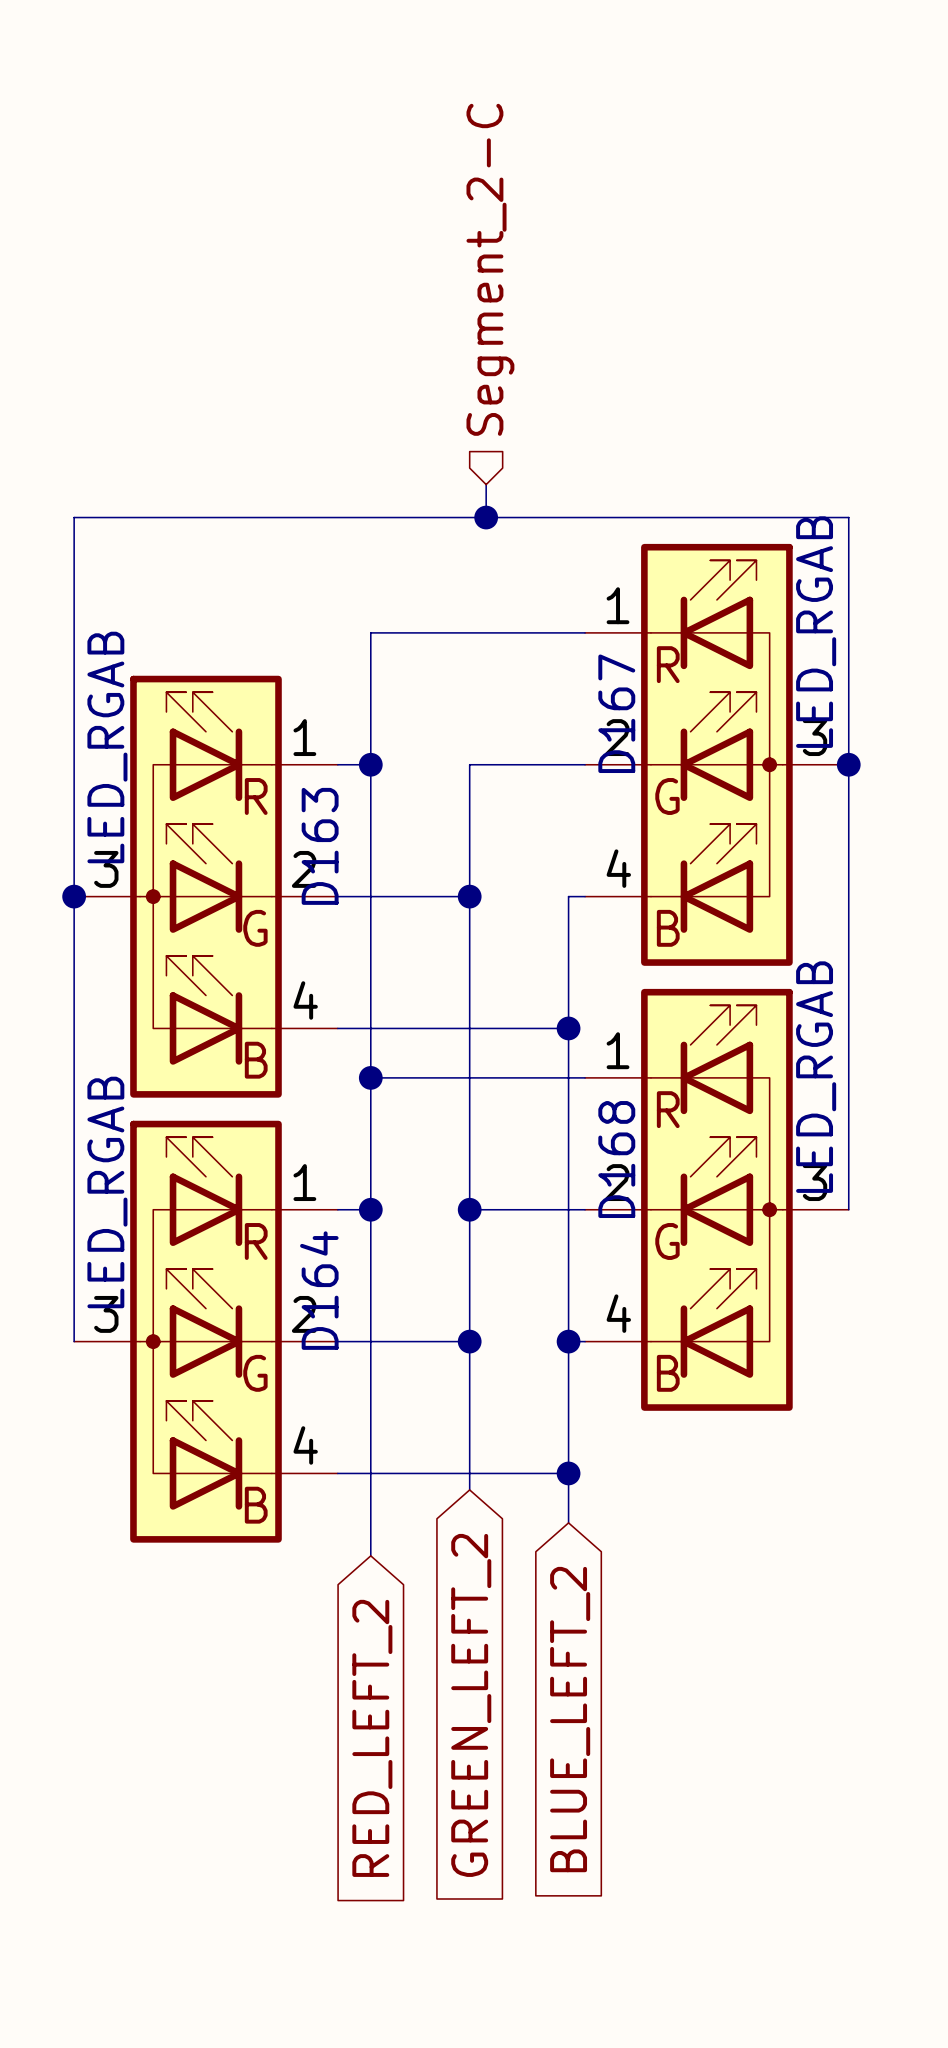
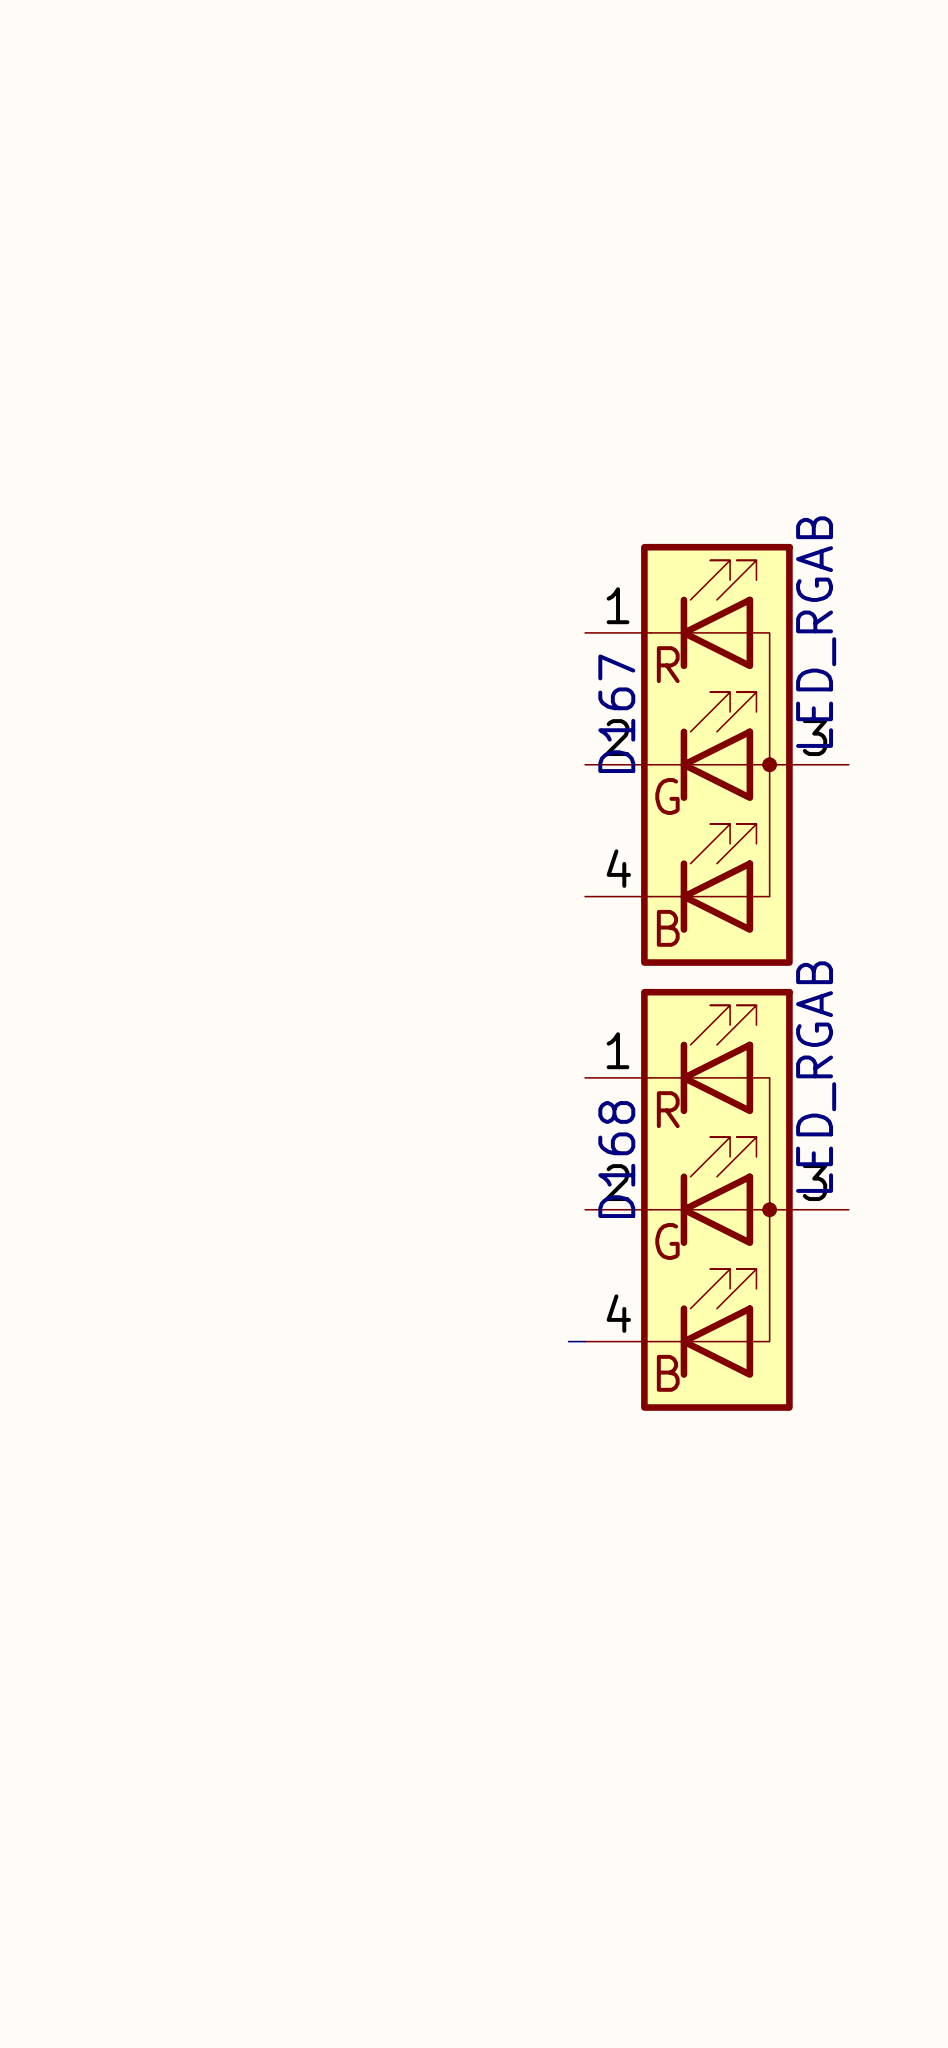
hierarchical label: Segment_2-C (490, 269) -> none
wire: (486, 484) (486, 517) -> none
junction: (486, 517) -> none
wire: (585, 632) (370, 632) (370, 1555) -> none
wire: (337, 764) (370, 764) -> none
junction: (370, 764) -> none
wire: (585, 764) (469, 764) (469, 1489) -> none
junction: (848, 764) -> none
D163: LED_RGAB (205, 886) -> none
junction: (74, 896) -> none
wire: (337, 896) (469, 896) -> none
junction: (469, 896) -> none
wire: (585, 896) (568, 896) (568, 1522) -> none
wire: (337, 1028) (568, 1028) -> none
junction: (568, 1028) -> none
wire: (370, 1077) (585, 1077) -> none
junction: (370, 1077) -> none
wire: (337, 1209) (370, 1209) -> none
junction: (370, 1209) -> none
wire: (469, 1209) (585, 1209) -> none
junction: (469, 1209) -> none
wire: (848, 1209) (848, 517) (74, 517) (74, 1341) -> none
D164: LED_RGAB (205, 1331) -> none
wire: (337, 1341) (469, 1341) -> none
junction: (469, 1341) -> none
junction: (568, 1341) -> none
wire: (337, 1473) (568, 1473) -> none
junction: (568, 1473) -> none
global label: GREEN_LEFT_2 (471, 1705) -> none
global label: BLUE_LEFT_2 (570, 1719) -> none
global label: RED_LEFT_2 (372, 1738) -> none

